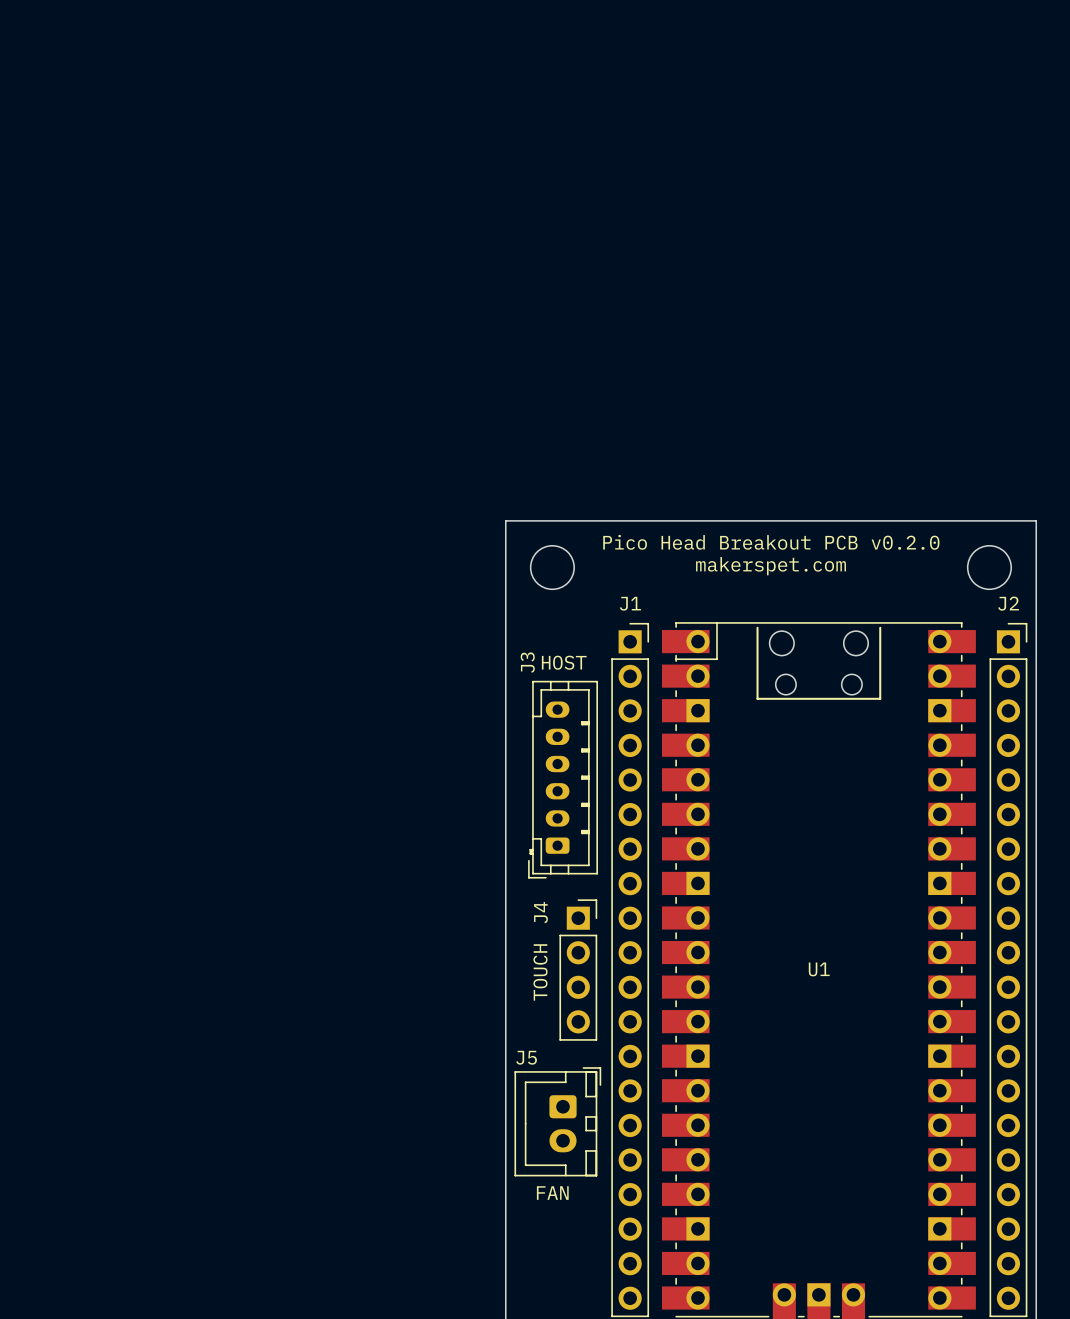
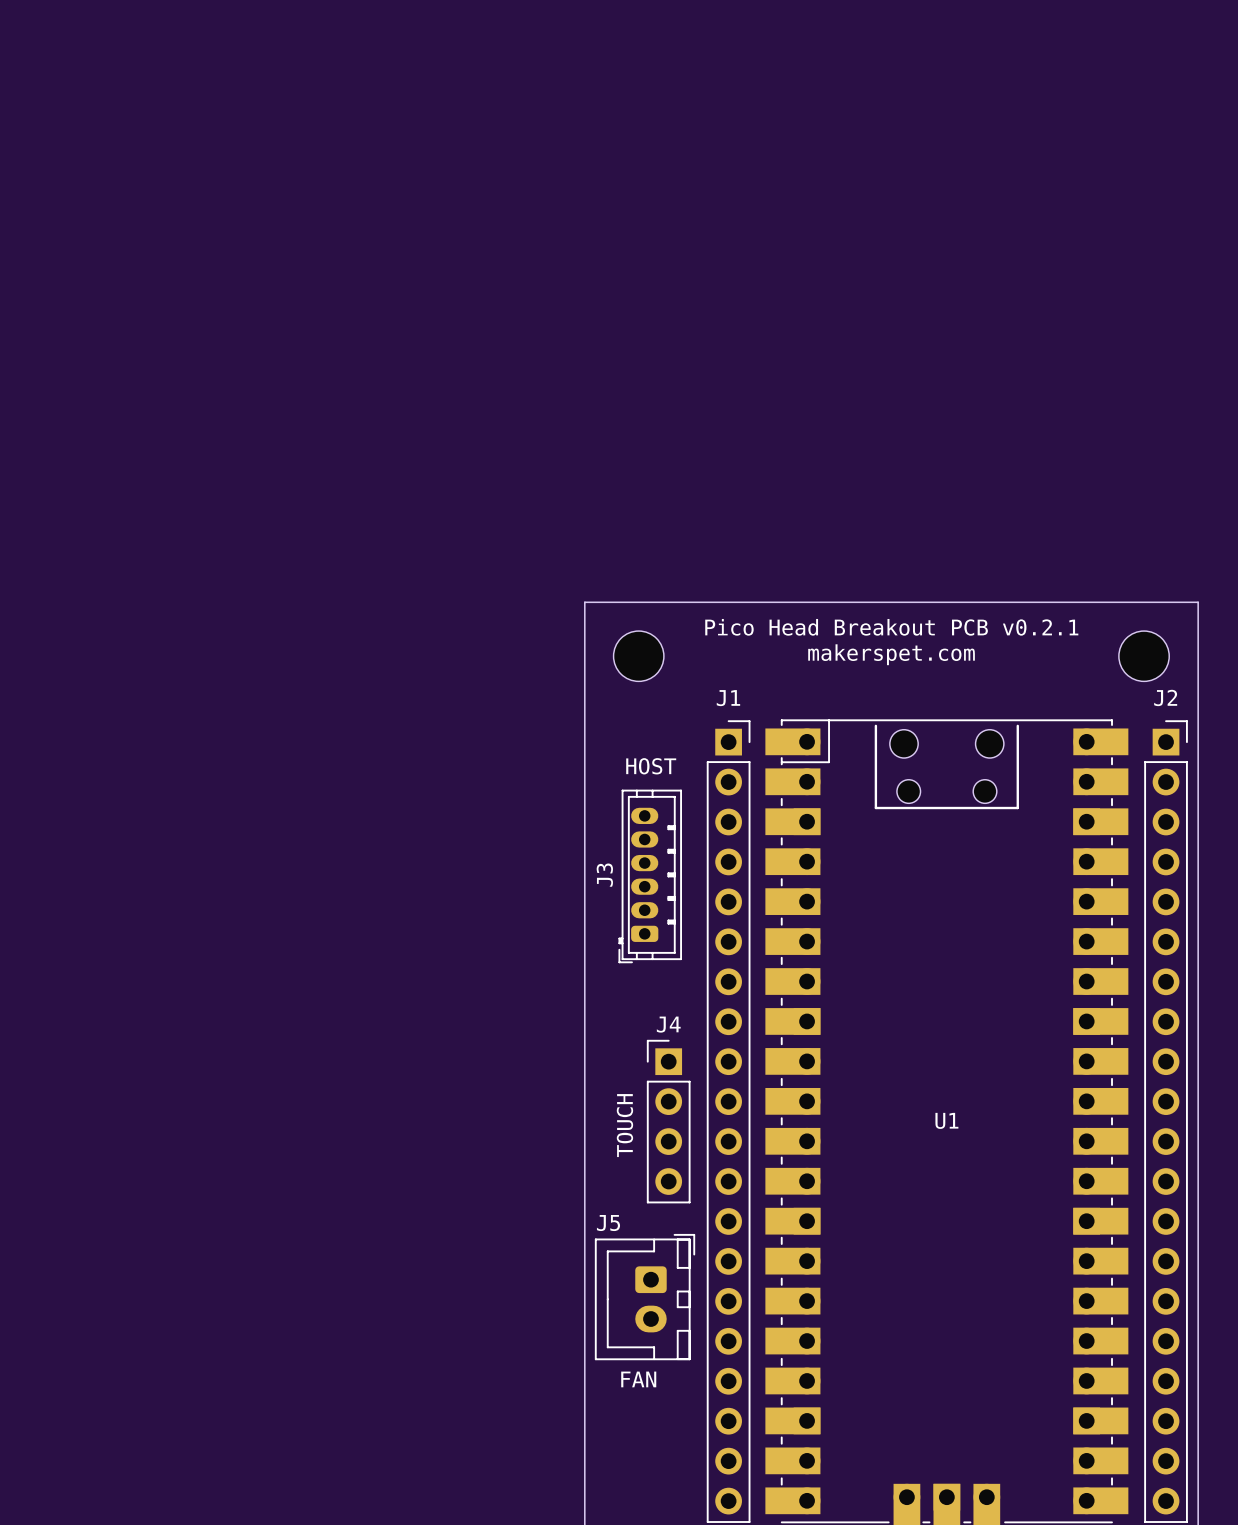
text: Pico Head Breakout PCB v0.2.0 (771, 542) -> Pico Head Breakout PCB v0.2.1 (891, 627)
J3 name position: J3 (527, 662) -> J3 (604, 875)
J3 footprint: [528, 680, 599, 879] -> [618, 789, 683, 964]
J4 footprint: [559, 899, 598, 1041] -> [646, 1039, 691, 1204]
J4 name position: J4 (540, 912) -> J4 (668, 1024)

